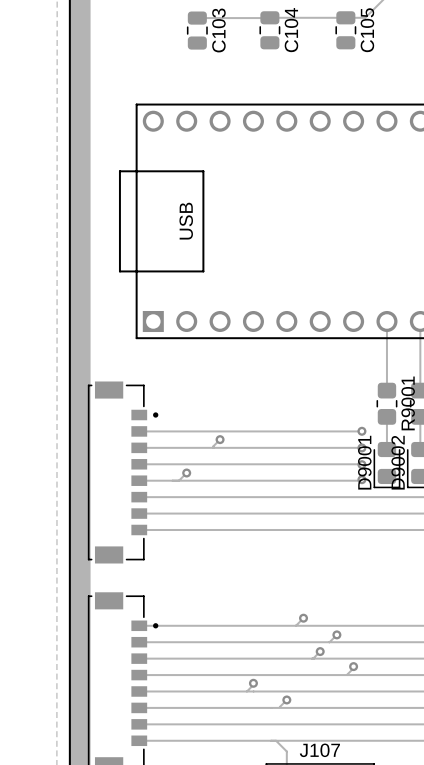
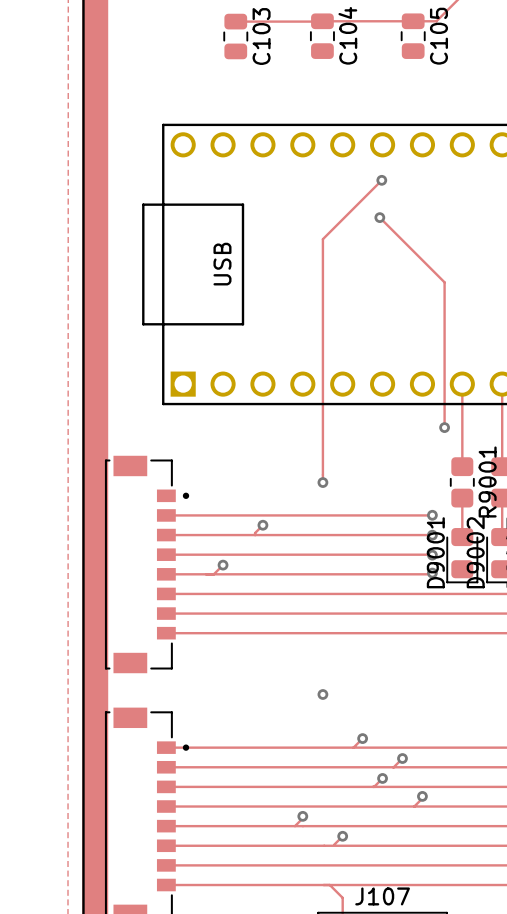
track: none -> (381, 180) (322, 239) (322, 482)
via: none -> (381, 180)
track: none -> (379, 217) (444, 282) (444, 427)
via: none -> (379, 217)
via: none -> (444, 427)
via: none -> (322, 482)
via: none -> (322, 694)

